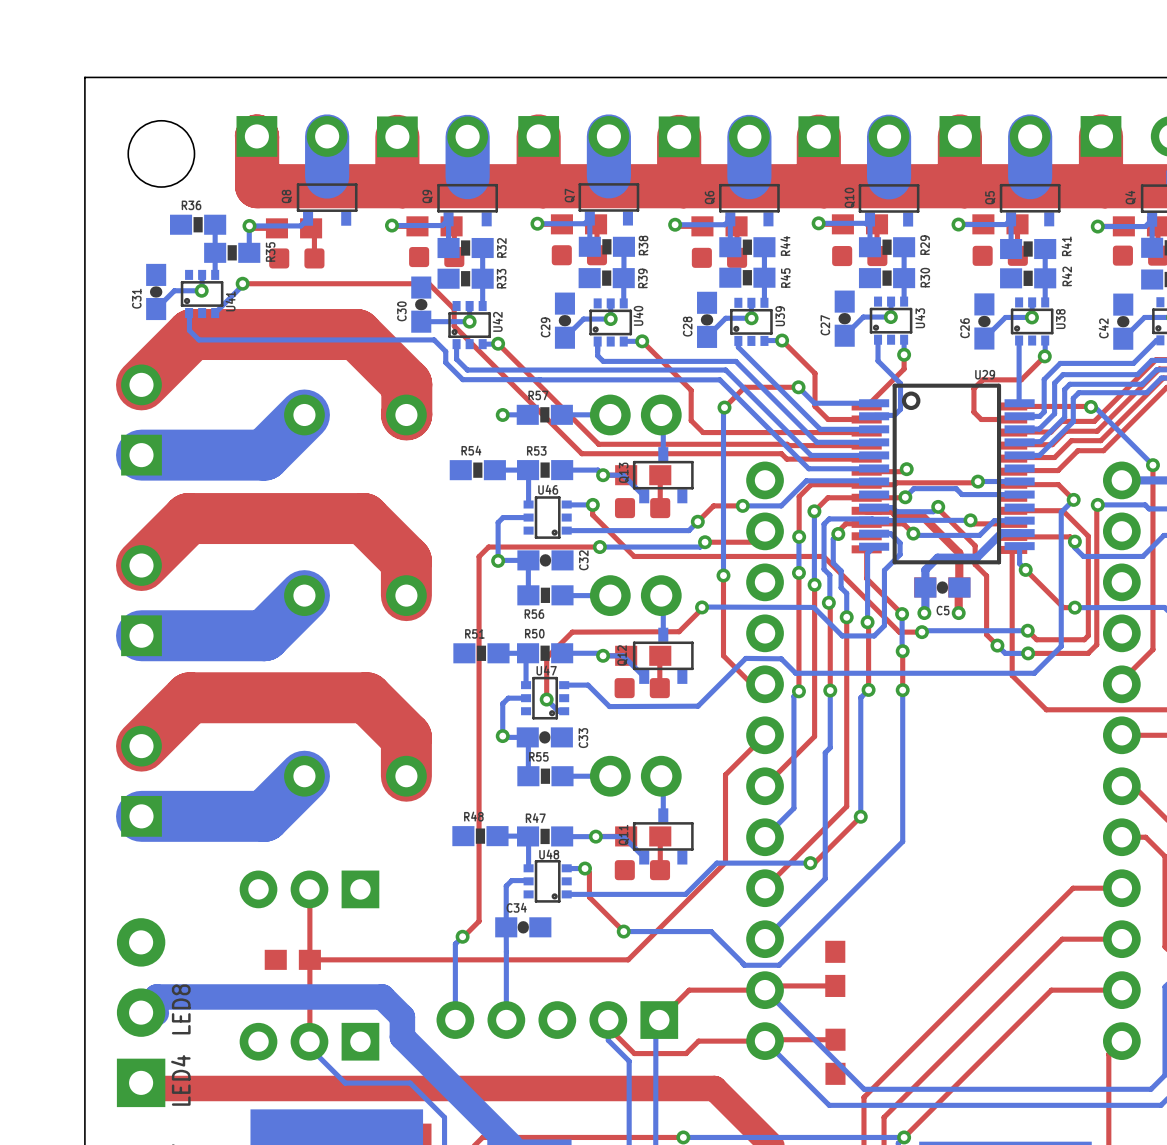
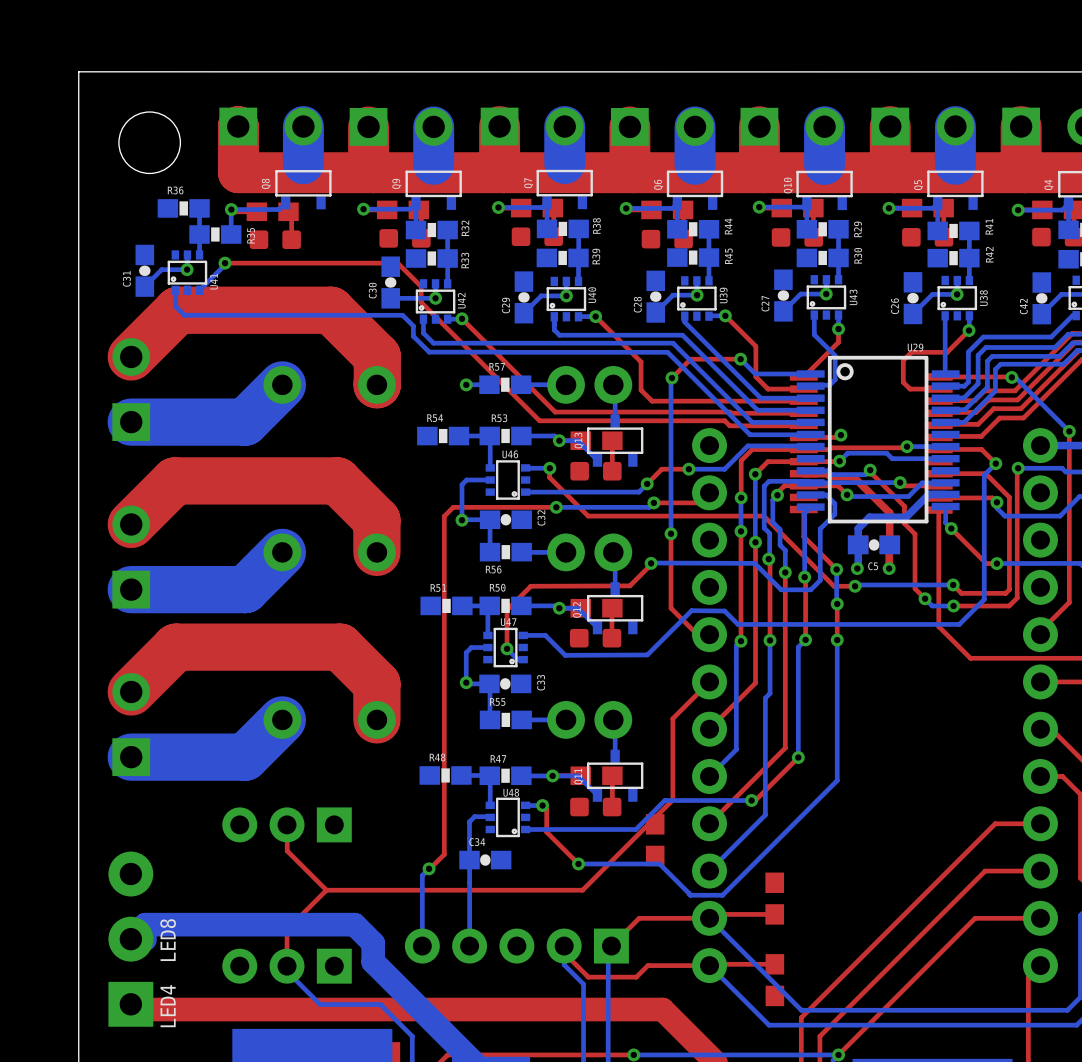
top track: (309, 889) (309, 1041) -> (287, 825) (287, 850) (326, 890) (287, 929) (287, 966)
part rotation: 0° (292, 959) -> 90° clockwise (655, 840)
part position: (292, 959) -> (655, 840)
top track: (352, 959) (309, 959) -> none

